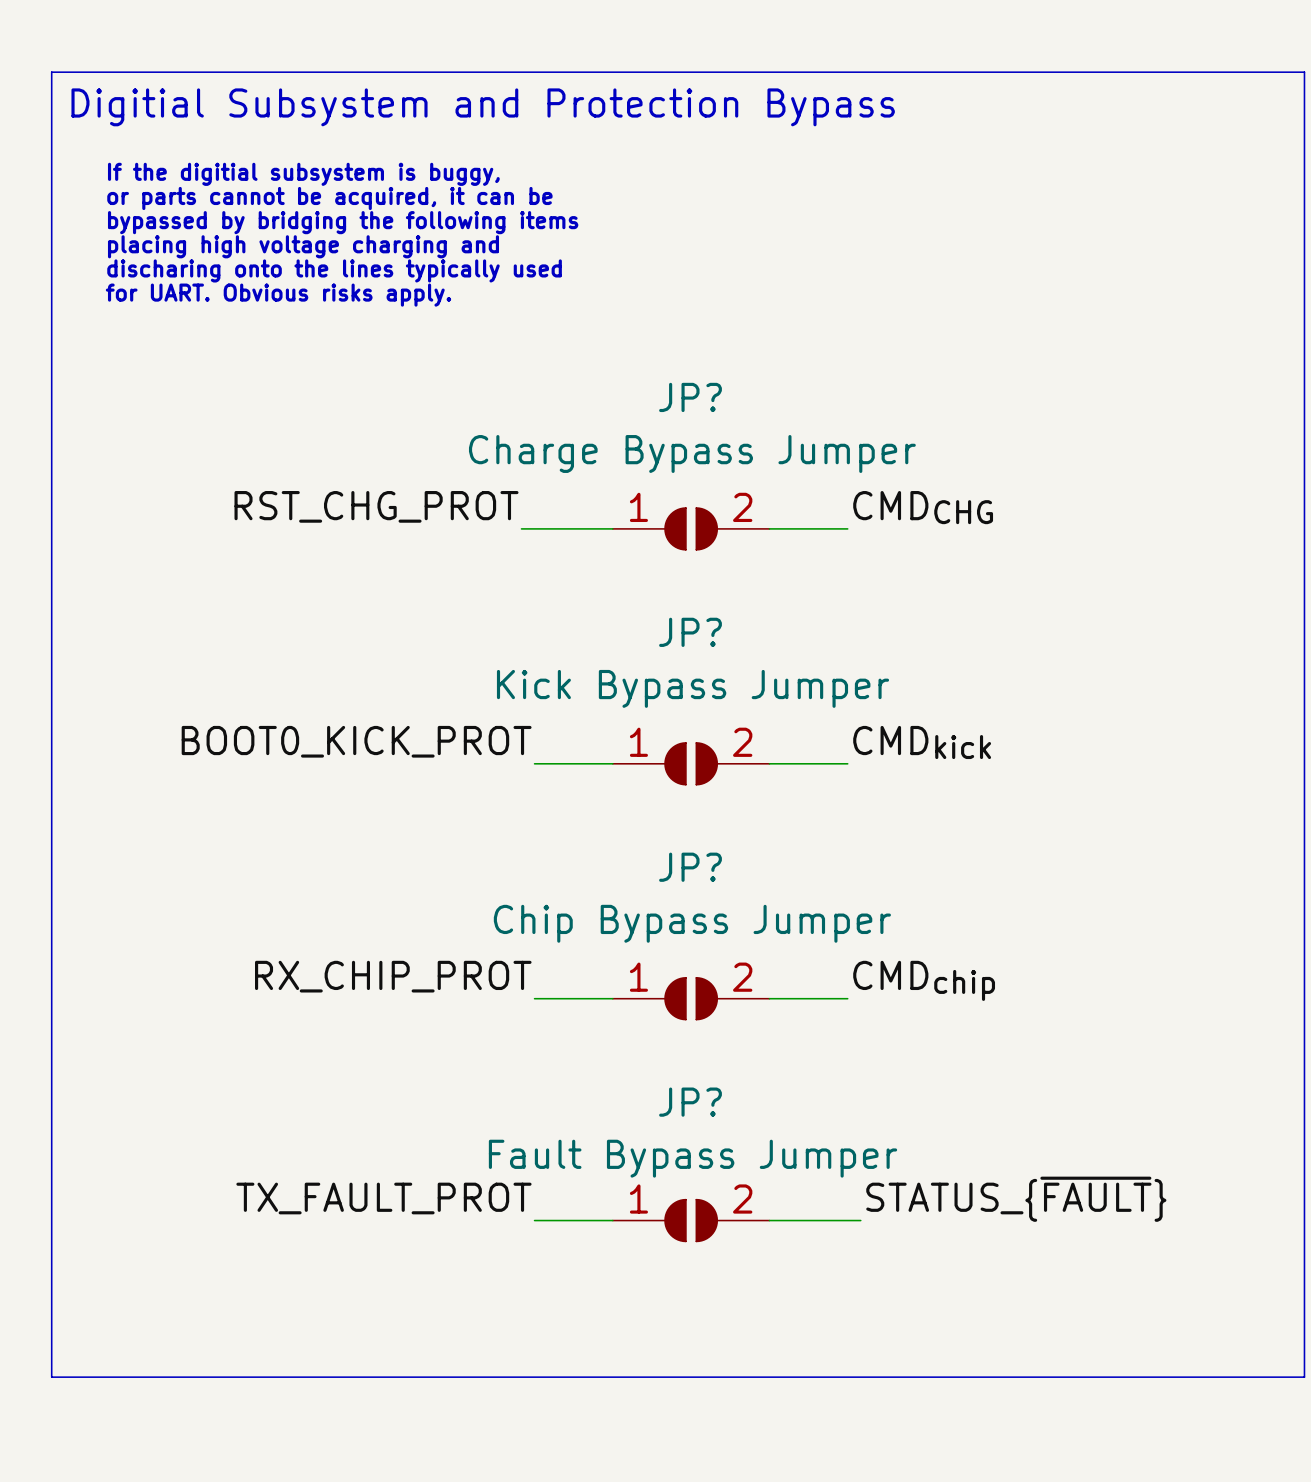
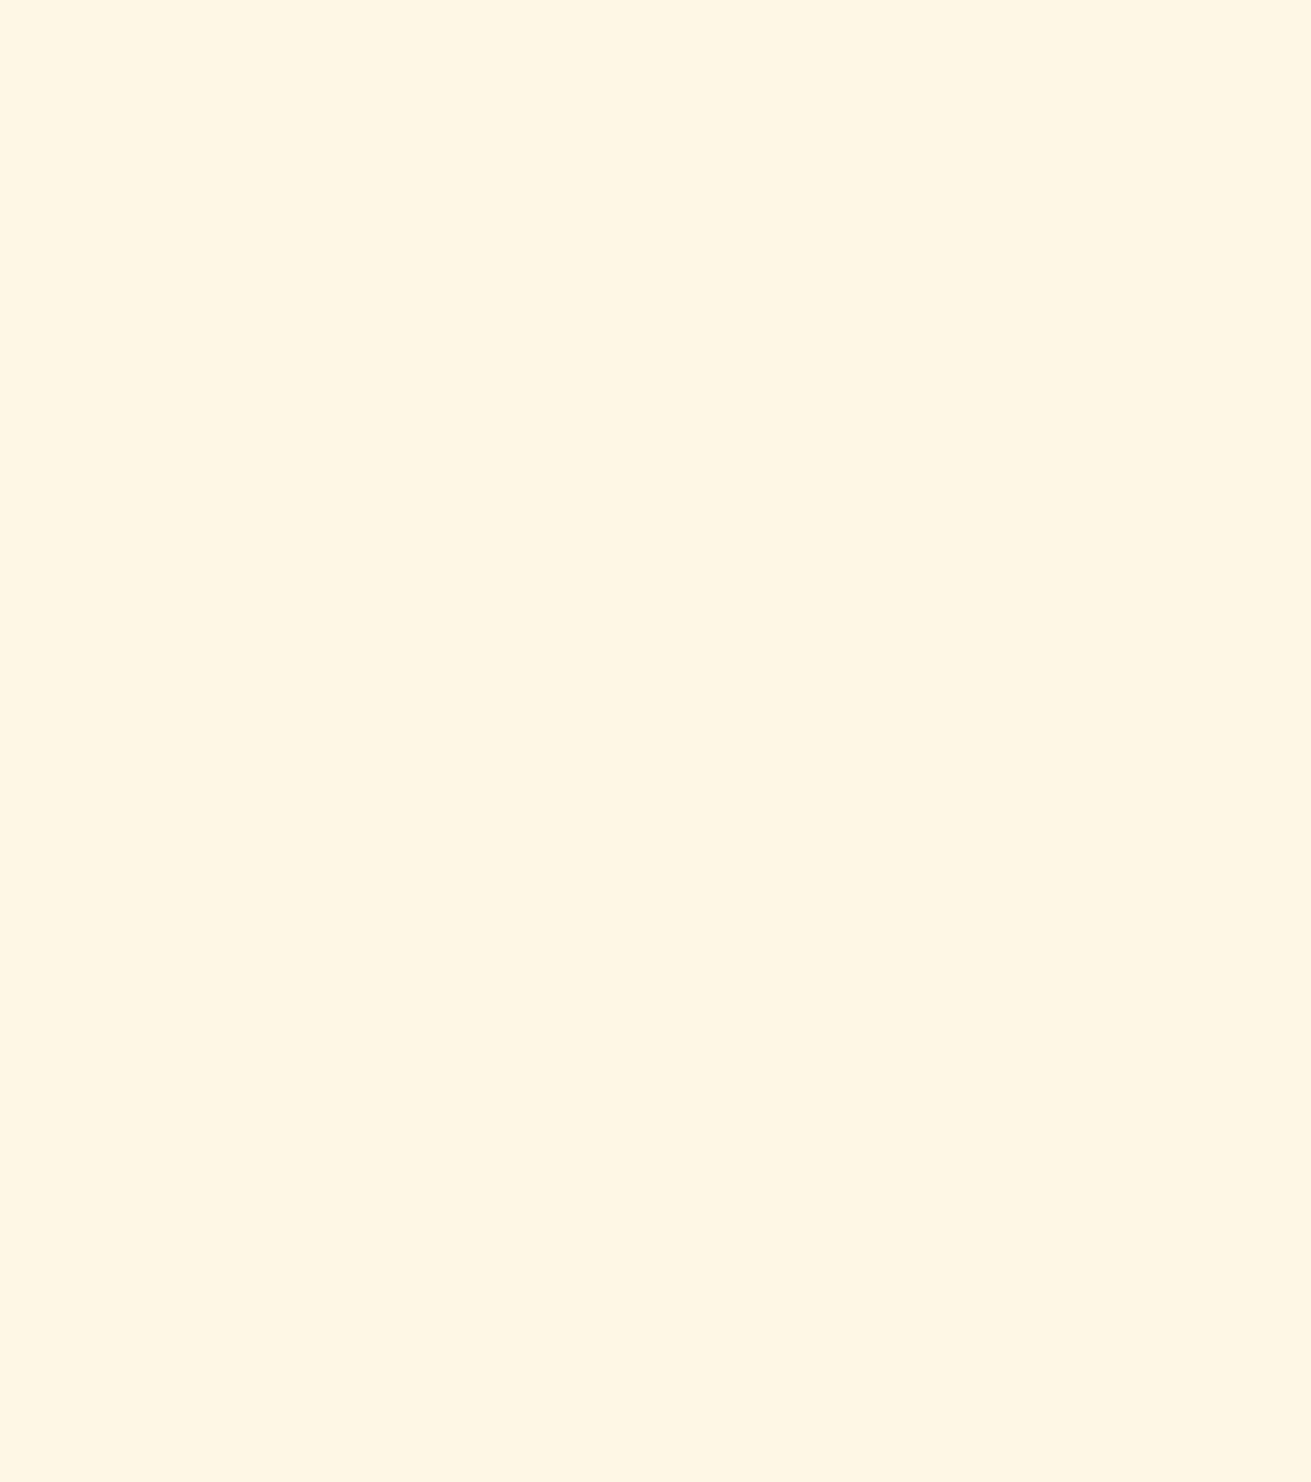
line: (51, 72) (1304, 72) (1304, 1377) (51, 1377) (51, 72) -> none
text: Digitial Subsystem and Protection Bypass (483, 107) -> none
text: If the digitial subsystem is buggy, (303, 174) -> none
text: or parts cannot be acquired, it can be (329, 198) -> none
text: bypassed by bridging the following items (343, 222) -> none
text: placing high voltage charging and (303, 246) -> none
text: discharing onto the lines typically used (334, 270) -> none
text: for UART. Obvious risks apply. (278, 295) -> none
label: RST_CHG_PROT (376, 506) -> none
label: CMDCHG (923, 507) -> none
wire: (521, 528) (612, 528) -> none
JP?: Charge Bypass Jumper (691, 528) -> none
wire: (769, 528) (847, 528) -> none
label: BOOT0_KICK_PROT (356, 741) -> none
label: CMDkick (922, 742) -> none
wire: (534, 763) (612, 763) -> none
JP?: Kick Bypass Jumper (691, 763) -> none
wire: (769, 763) (847, 763) -> none
label: RX_CHIP_PROT (393, 976) -> none
label: CMDchip (924, 980) -> none
wire: (534, 998) (612, 998) -> none
JP?: Chip Bypass Jumper (691, 998) -> none
wire: (769, 998) (847, 998) -> none
label: TX_FAULT_PROT (383, 1198) -> none
label: STATUS_{~{FAULT}} (1016, 1199) -> none
wire: (534, 1220) (612, 1220) -> none
JP?: Fault Bypass Jumper (691, 1220) -> none
wire: (769, 1220) (860, 1220) -> none

